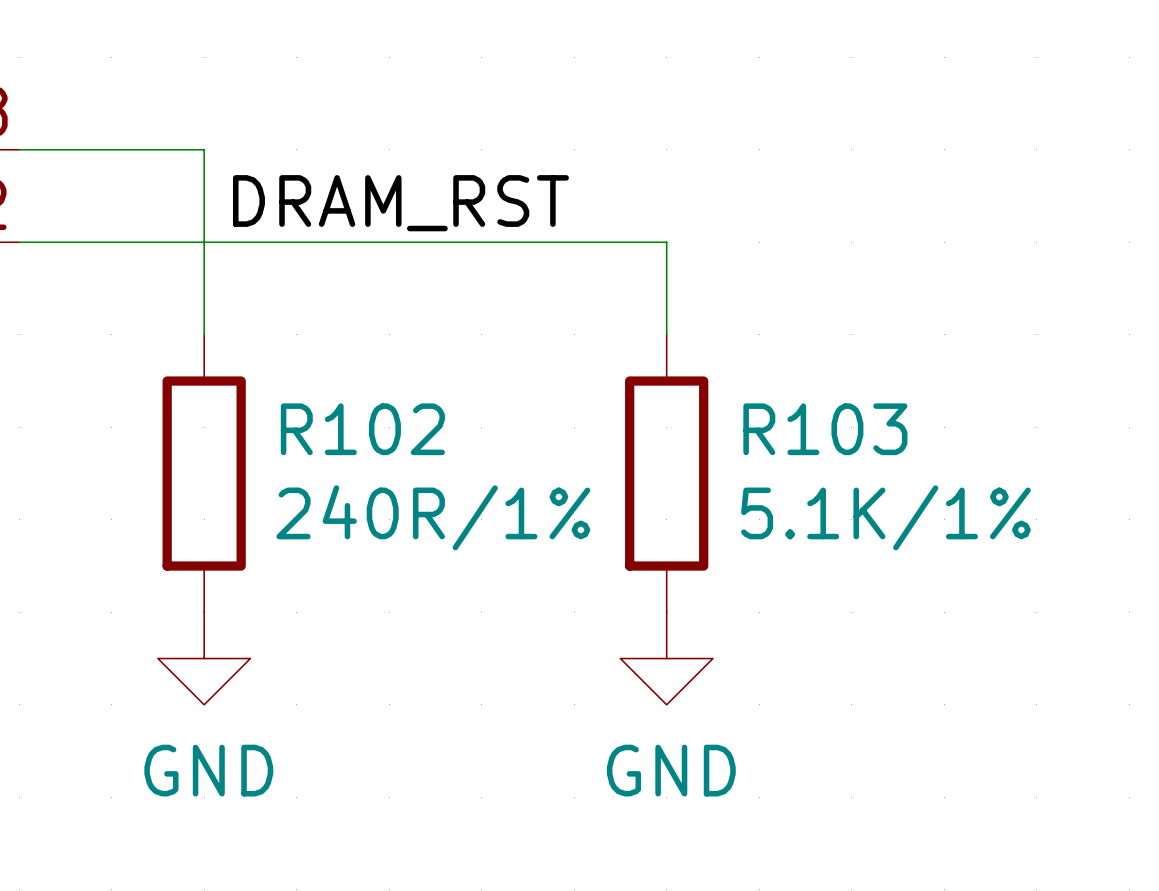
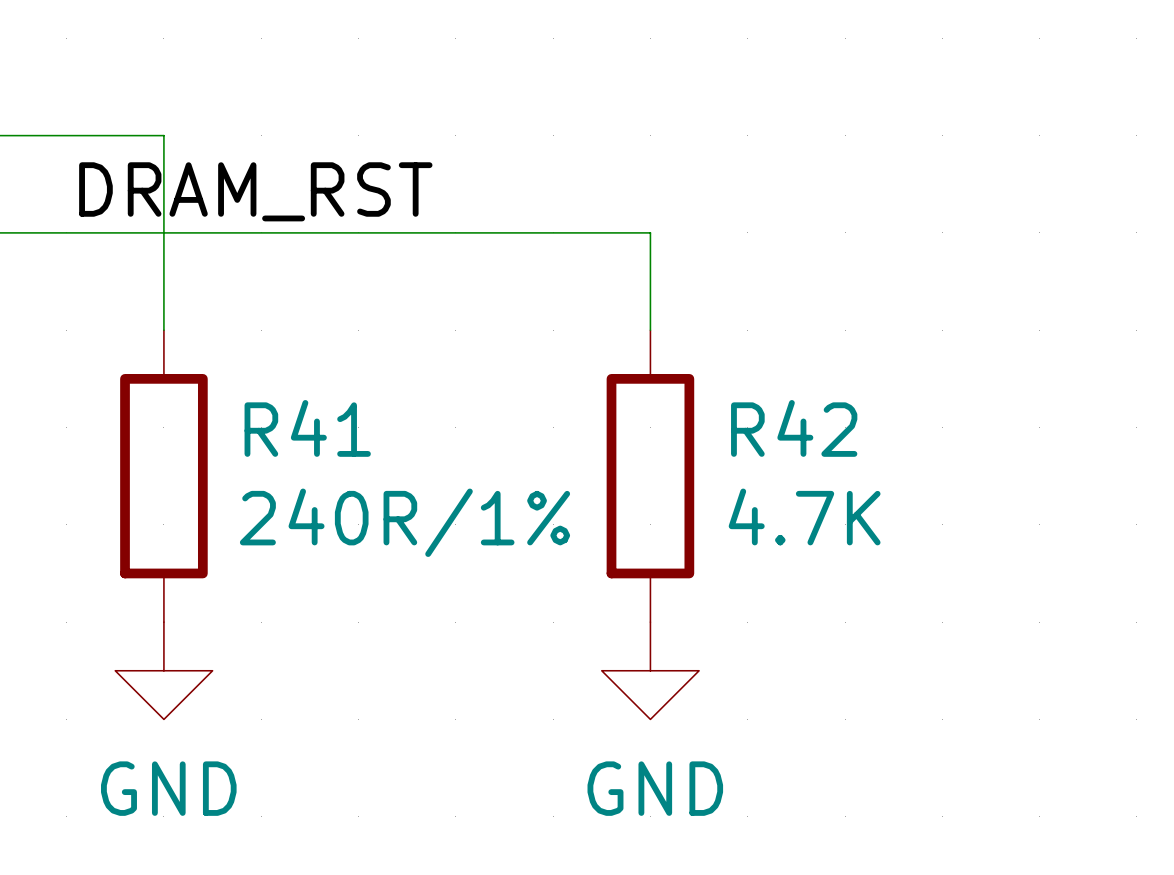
label position: DRAM_RST (400, 203) -> DRAM_RST (255, 191)
R102 name: R102 (362, 429) -> R41 (307, 428)
R103 name: R103 (825, 429) -> R42 (794, 428)
R103 value: 5.1K/1% (885, 517) -> 4.7K (804, 516)

